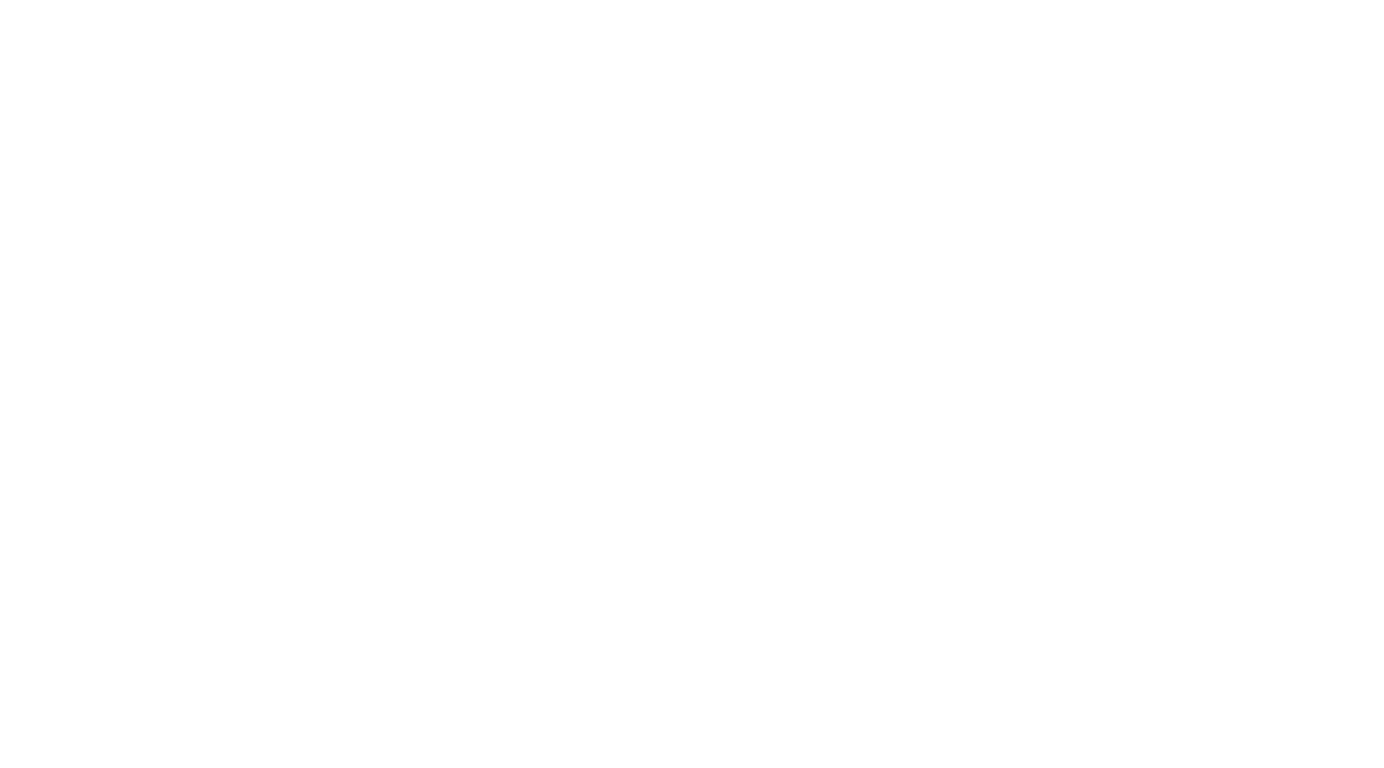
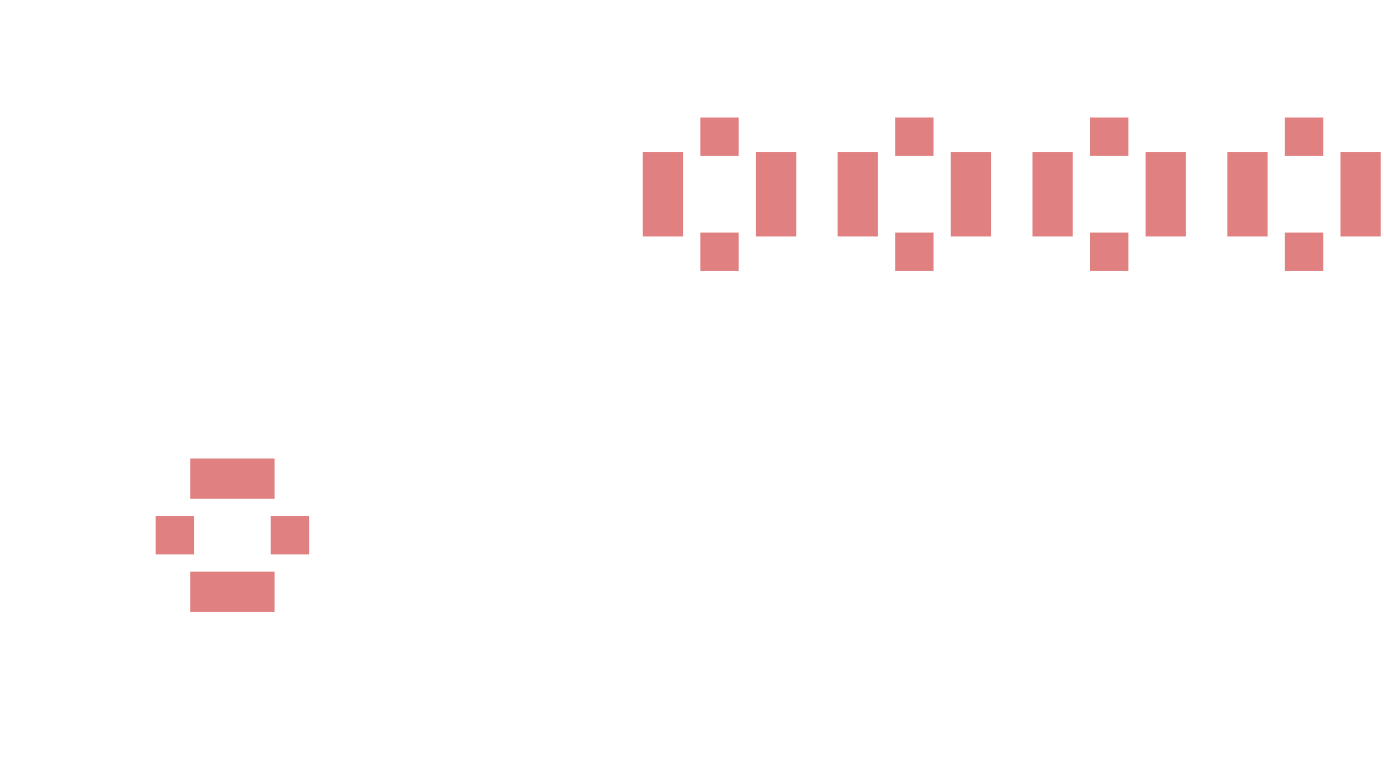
part: none -> (719, 194)
part: none -> (914, 194)
part: none -> (1109, 194)
part: none -> (1304, 194)
part: none -> (232, 535)

